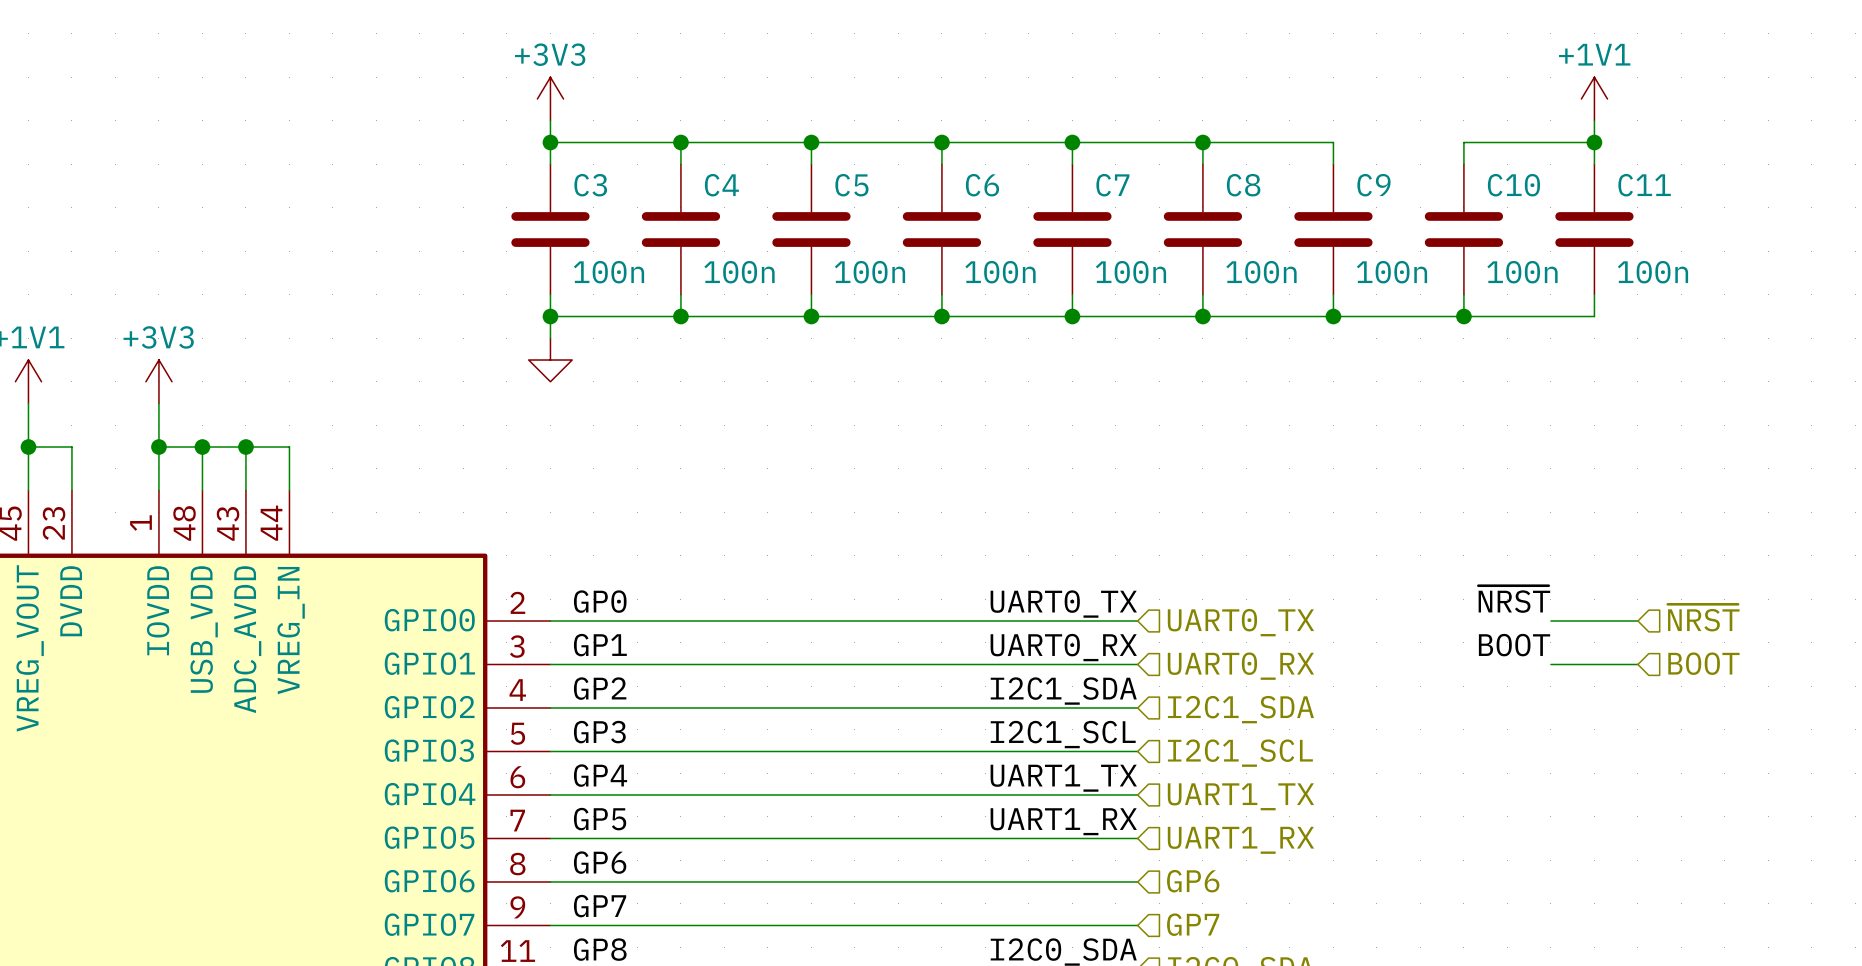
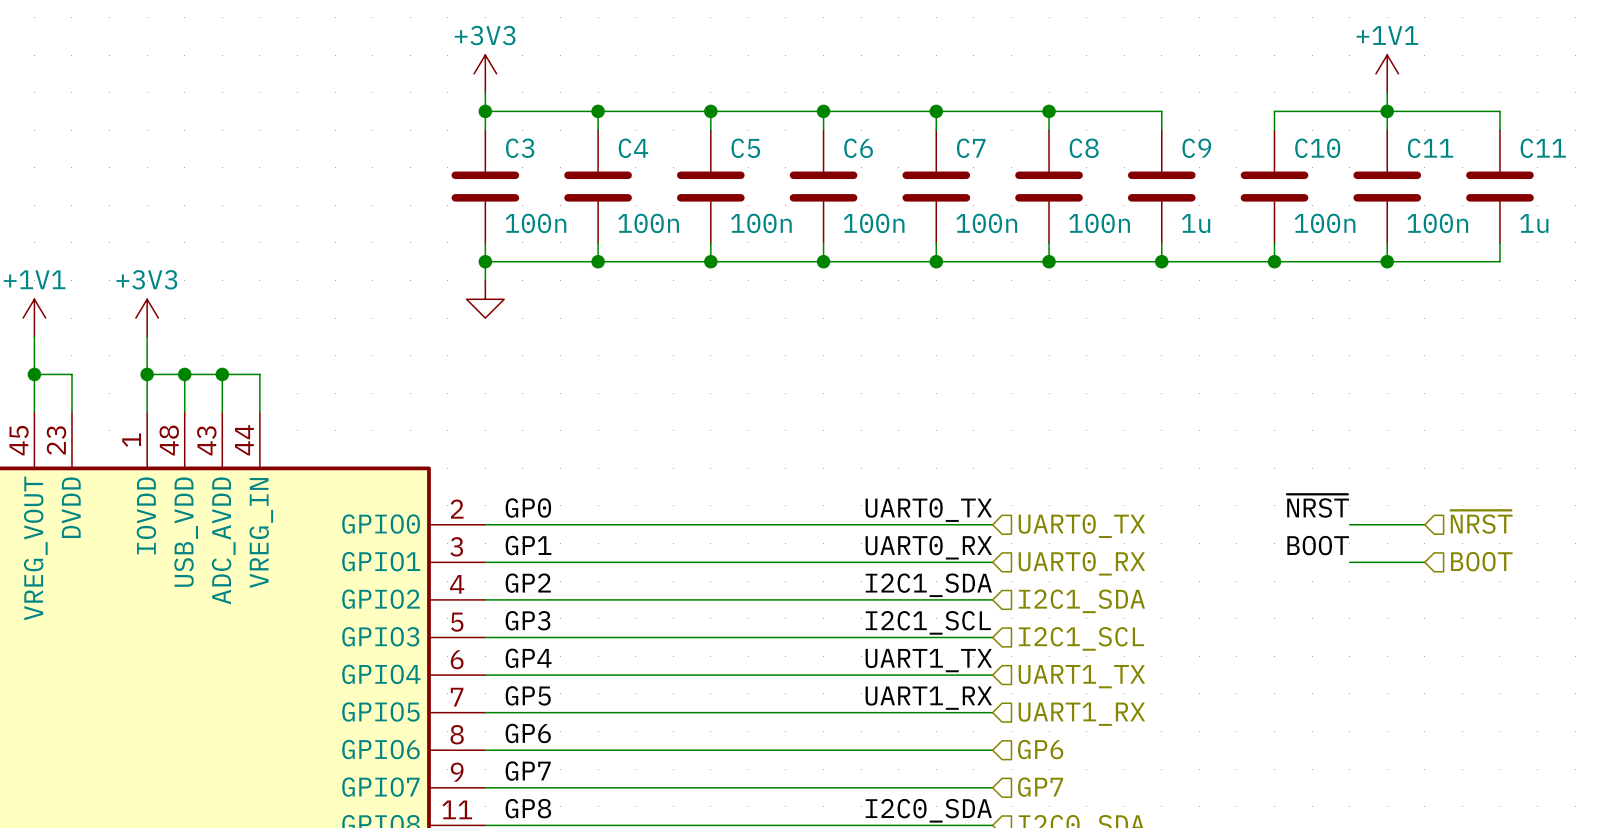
wire: none -> (1387, 111) (1499, 111) (1499, 130)
C11: none -> 1u (1499, 186)
C9 value: 100n (1391, 272) -> 1u (1196, 223)
wire: none -> (1499, 242) (1499, 261) (1387, 261)
junction: none -> (1387, 261)

